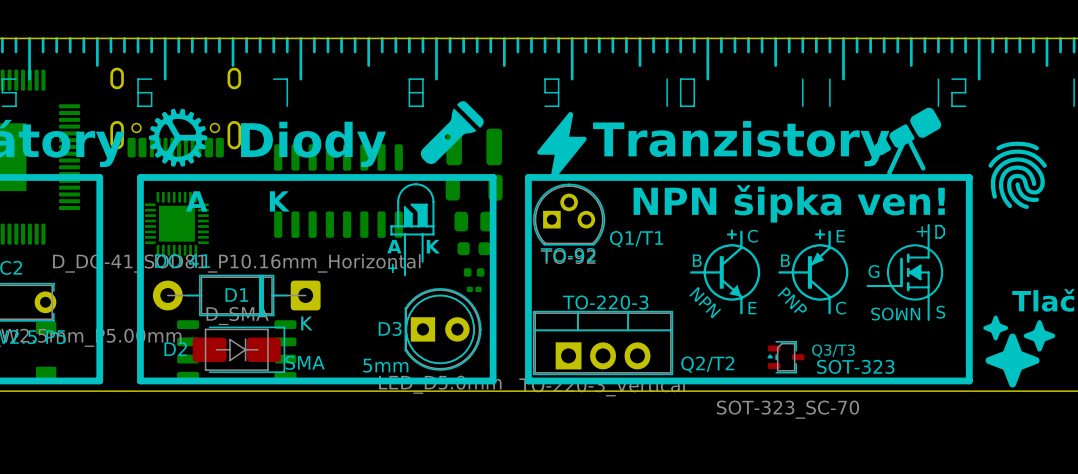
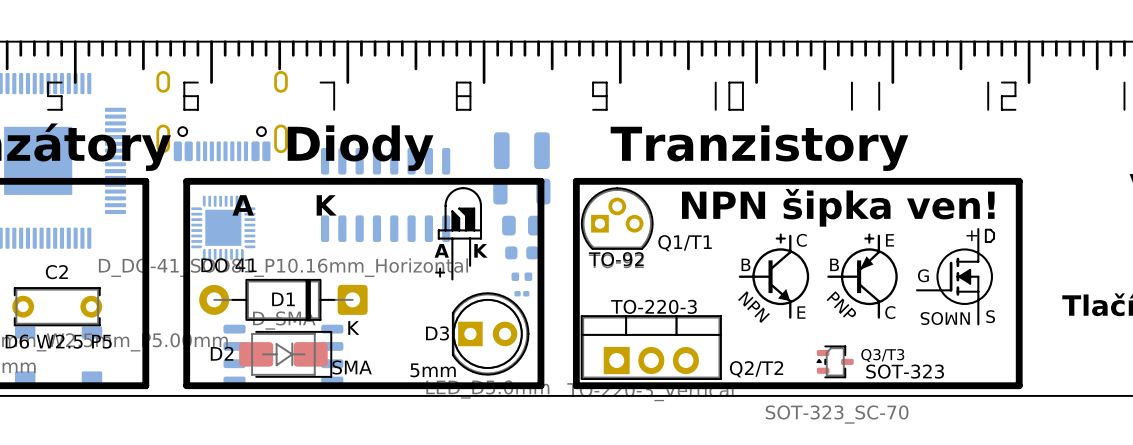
drawing: [420, 101, 484, 165] -> none
drawing: [873, 107, 942, 176] -> none
drawing: [148, 108, 208, 167] -> none
drawing: [537, 112, 587, 180] -> none
drawing: [988, 141, 1047, 209] -> none
text position: Tranzistory (741, 143) -> Tranzistory (759, 148)
drawing: [983, 315, 1056, 388] -> none

